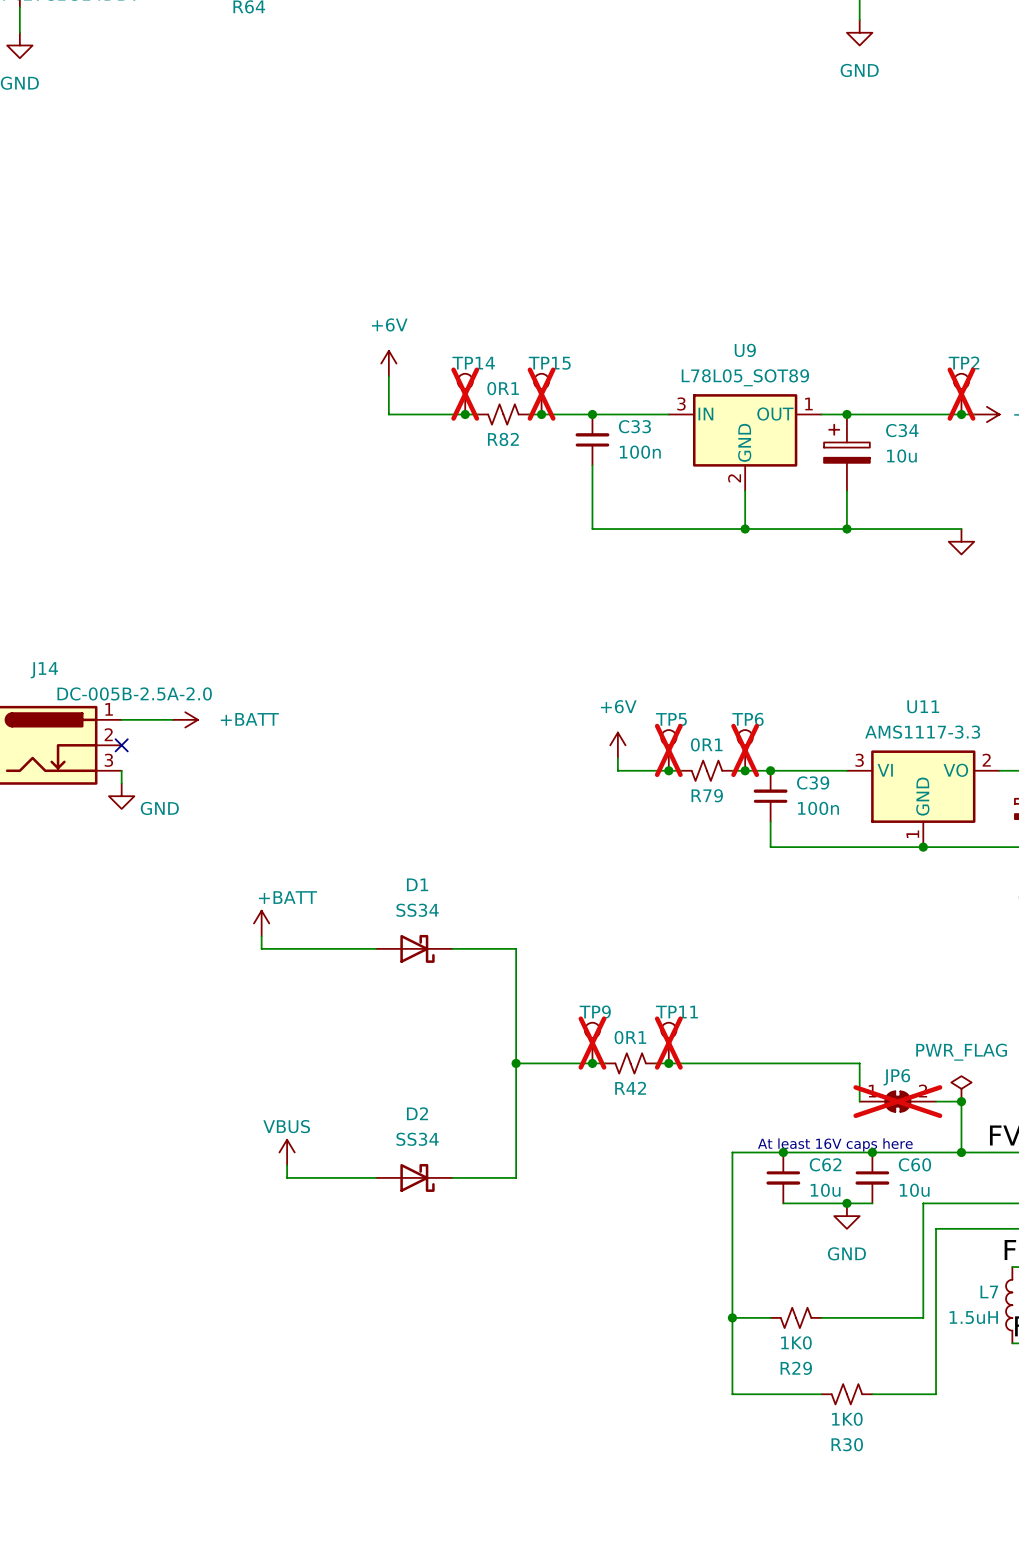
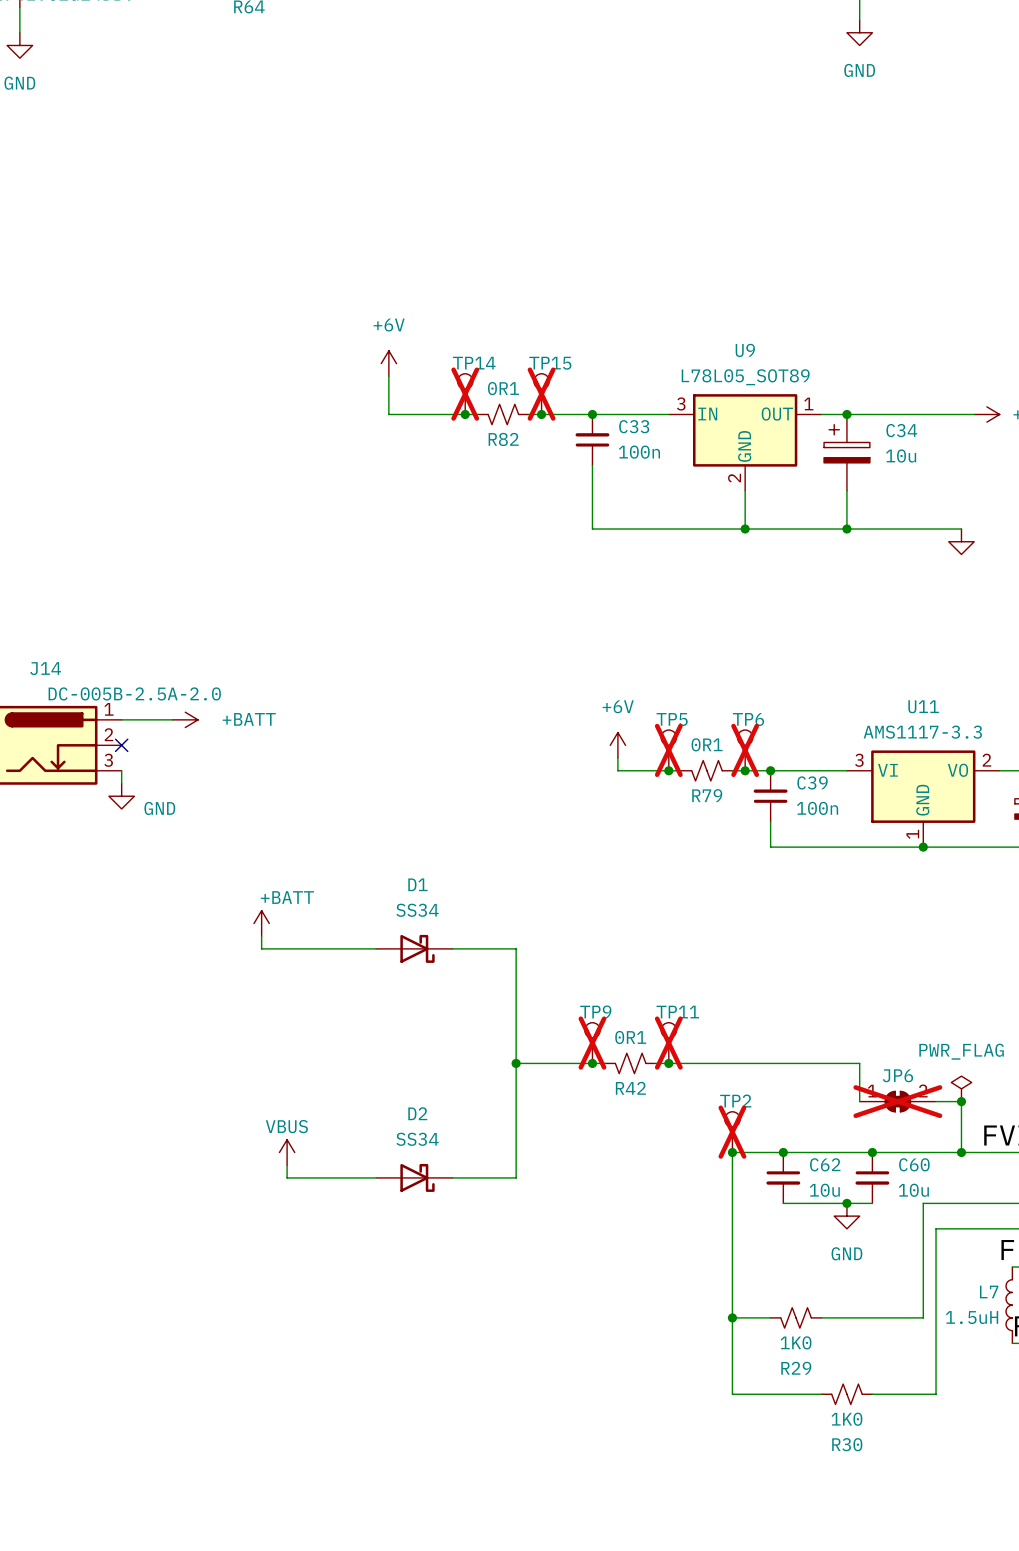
TP2 position: (961, 394) -> (732, 1132)
junction: (961, 414) -> none
text: At least 16V caps here (835, 1144) -> none
junction: none -> (732, 1152)

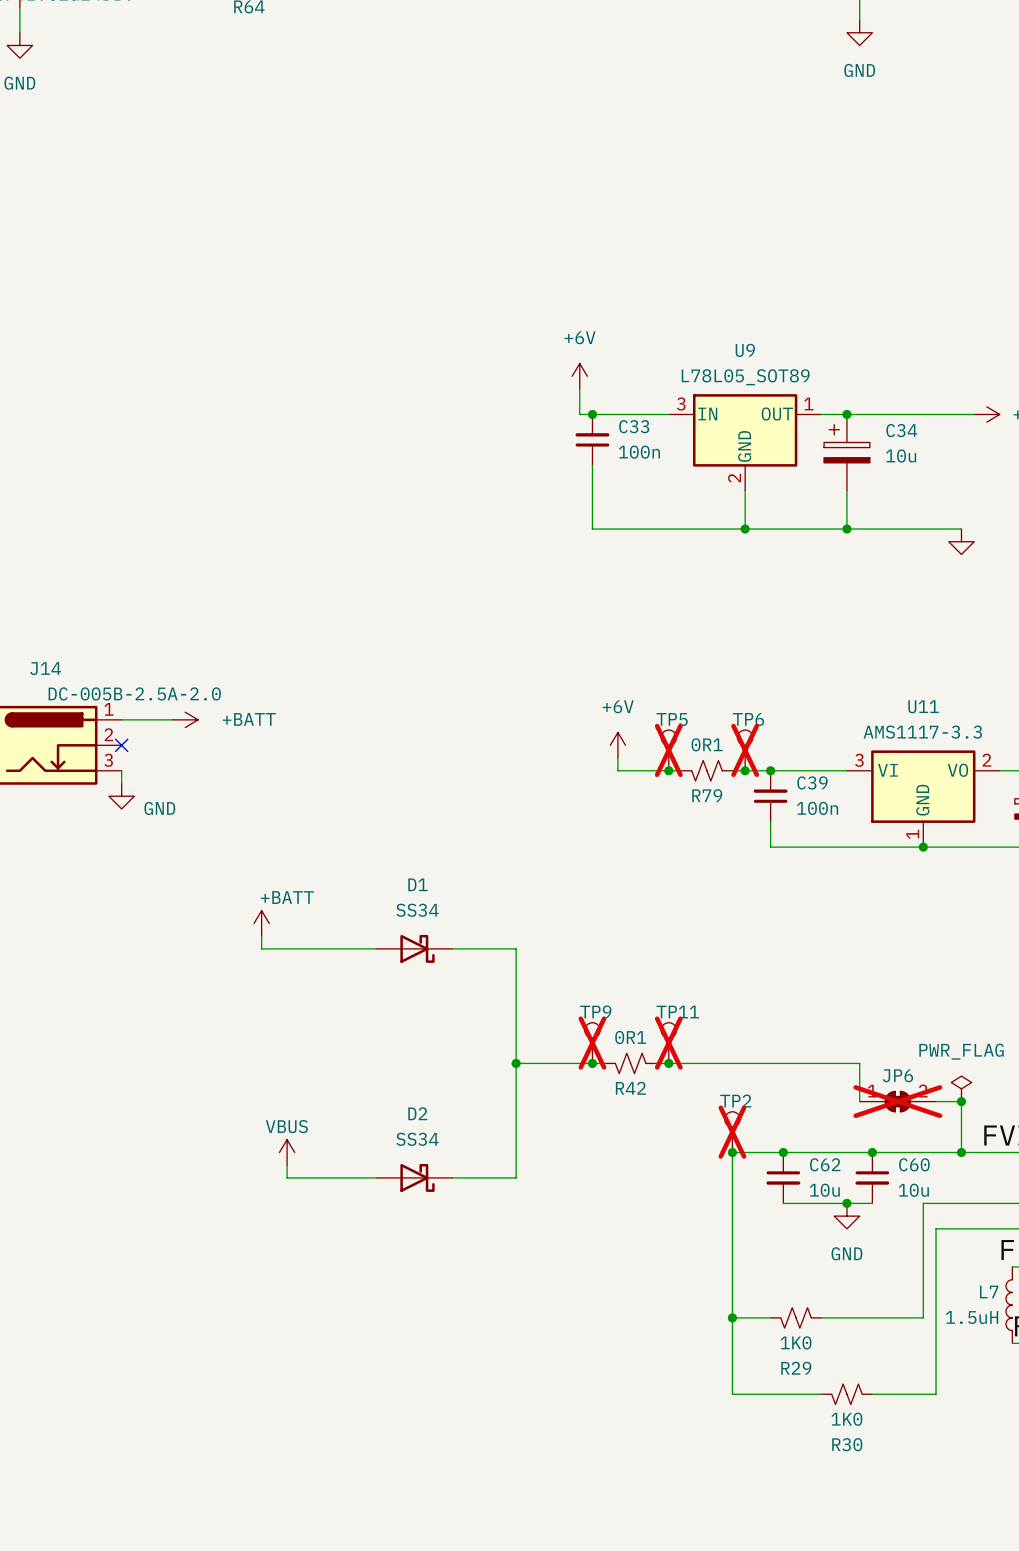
power symbol position: +6V (388, 363) -> +6V (579, 376)
wire: (388, 376) (388, 414) (477, 414) -> none
TP14: (465, 394) -> none
TP15: (541, 394) -> none
junction: (465, 414) -> none
R82: 0R1 (503, 414) -> none
wire: (528, 414) (579, 414) -> (579, 389) (579, 414)
junction: (541, 414) -> none

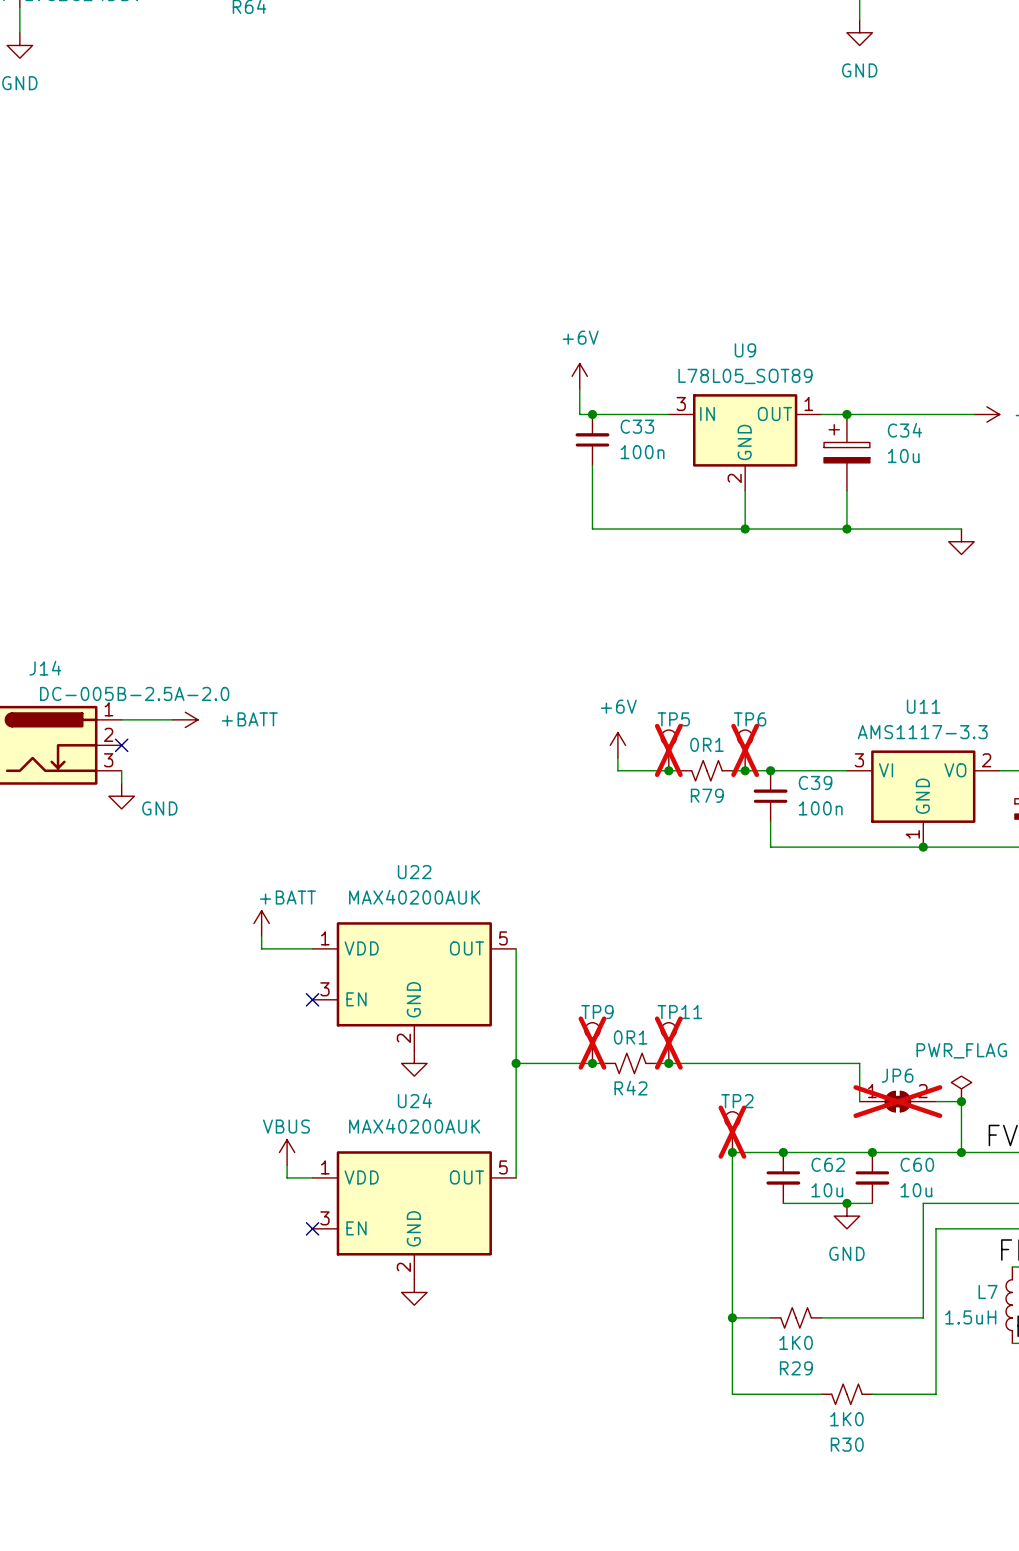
D1: SS34 (414, 948) -> none
U22: none -> MAX40200AUK (414, 986)
no-connect mark: none -> (312, 999)
power symbol: none -> (414, 1063)
D2: SS34 (414, 1177) -> none
U24: none -> MAX40200AUK (414, 1215)
no-connect mark: none -> (312, 1228)
power symbol: none -> (414, 1292)

